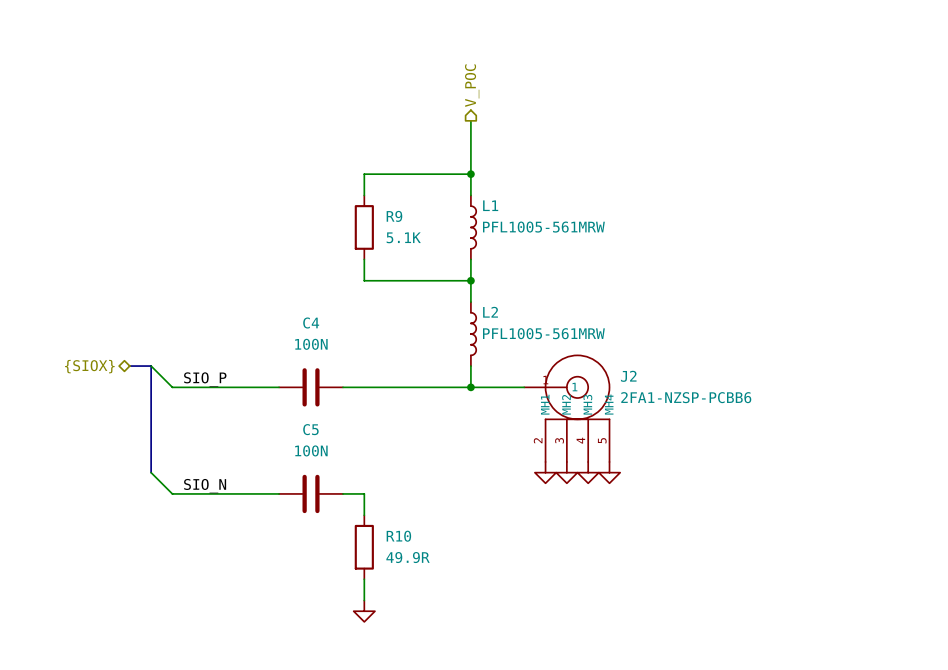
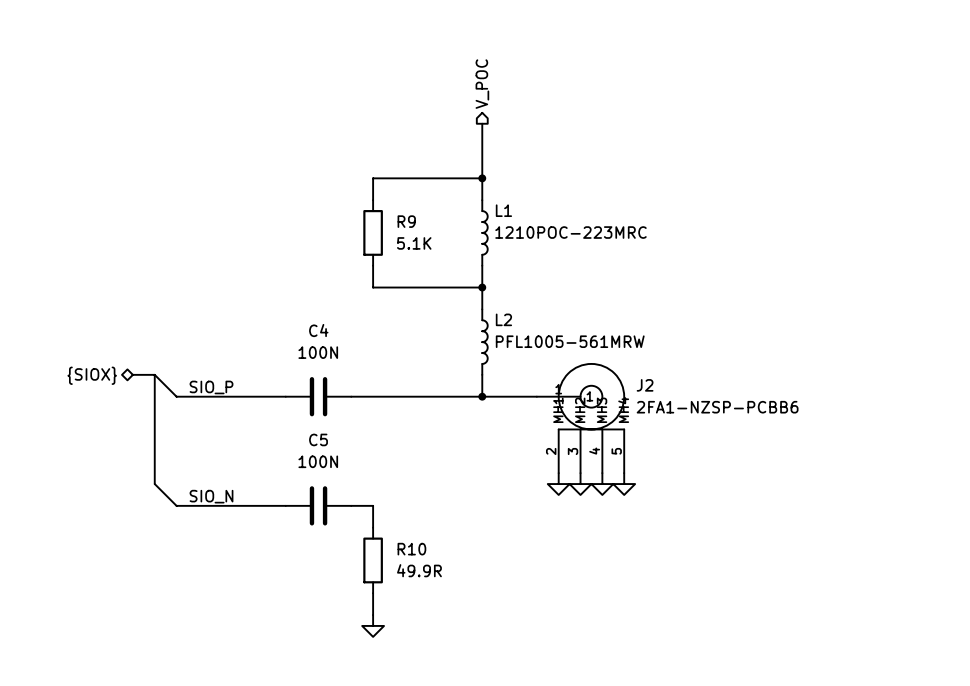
L1 value: PFL1005-561MRW (543, 227) -> 1210POC-223MRC (571, 232)

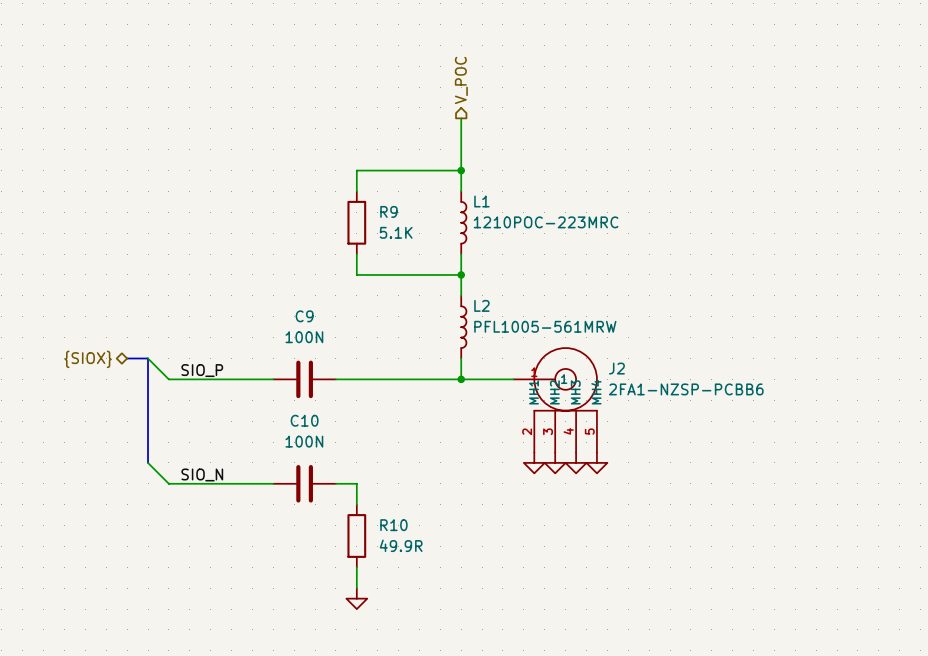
C4 name: C4 (318, 330) -> C9 (304, 316)
C5 name: C5 (318, 439) -> C10 (304, 420)

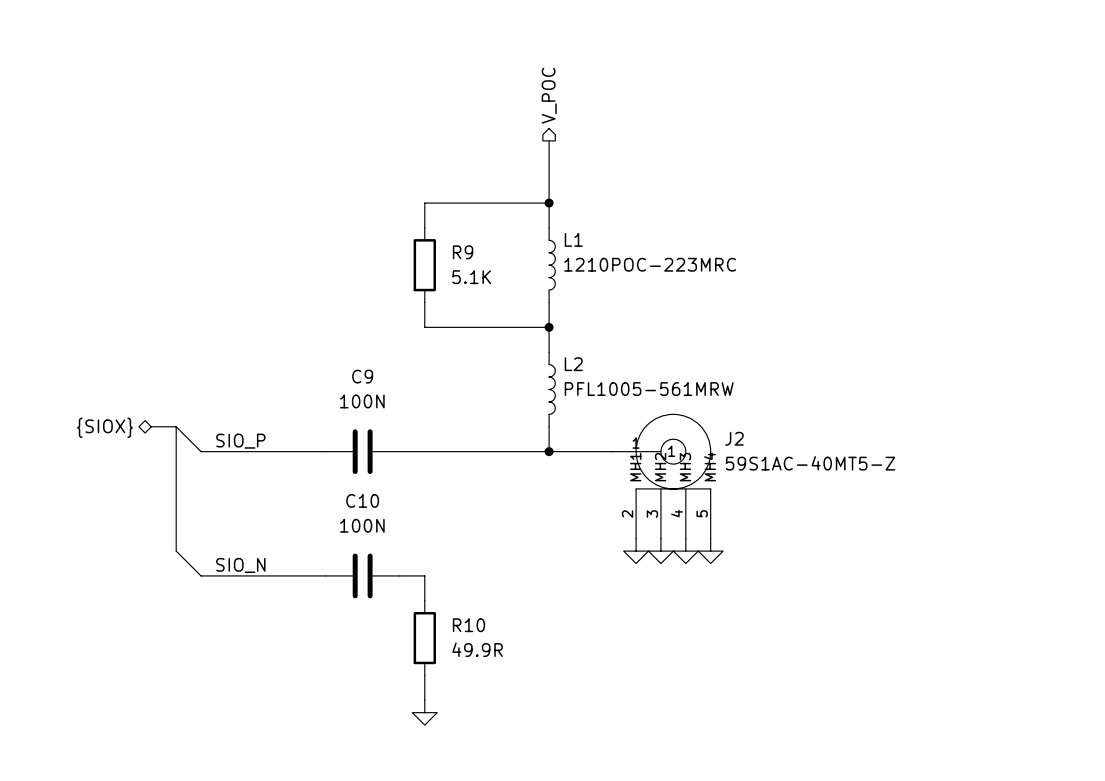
J2 value: 2FA1-NZSP-PCBB6 (686, 389) -> 59S1AC-40MT5-Z (810, 463)

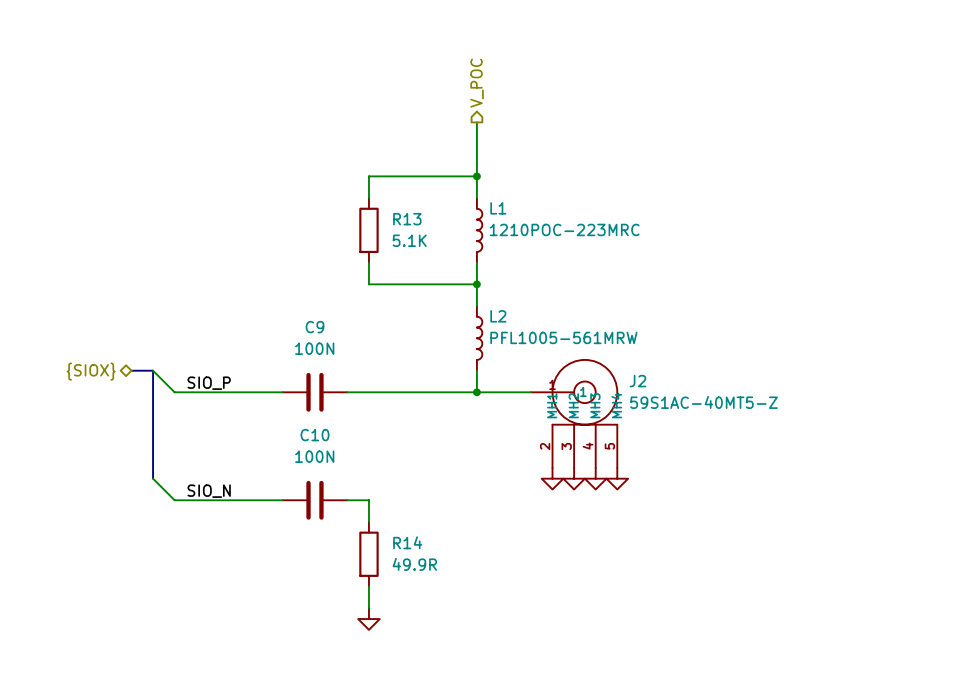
R9 name: R9 (463, 252) -> R13 (407, 219)
R10 name: R10 (468, 625) -> R14 (407, 542)

